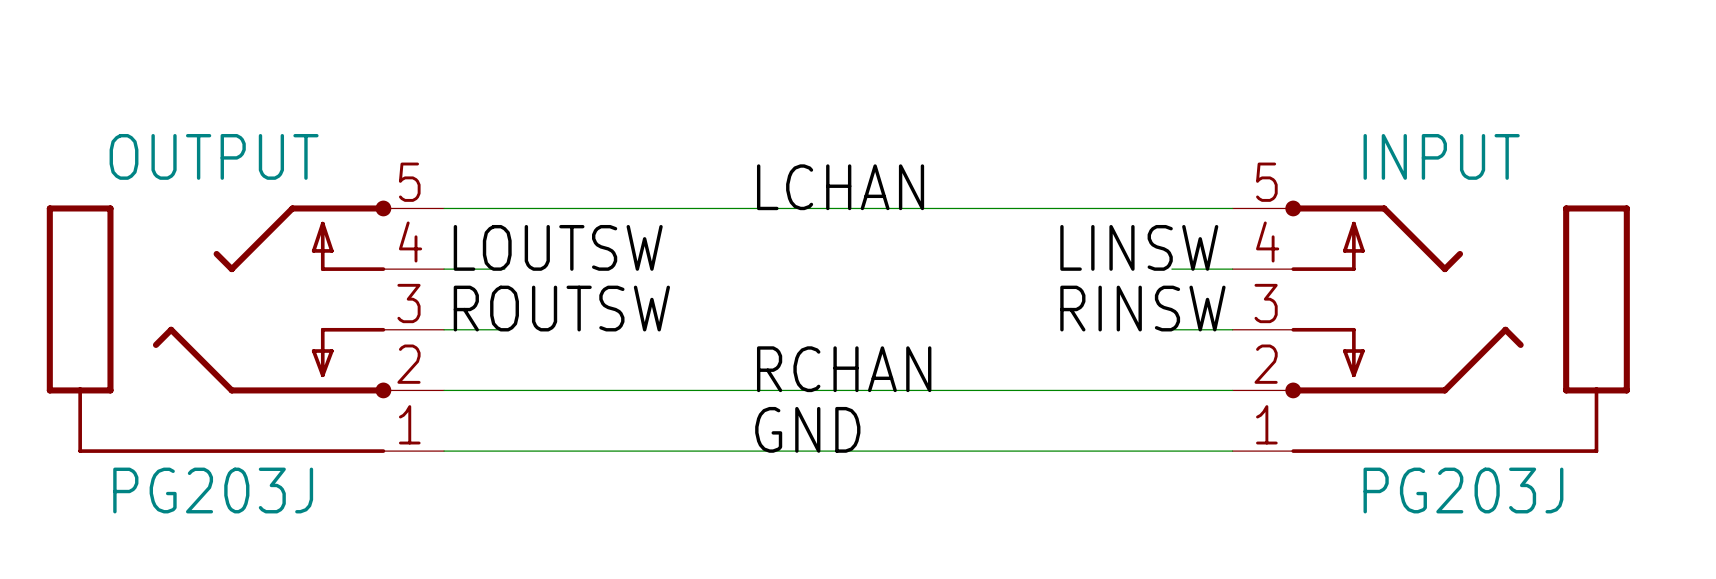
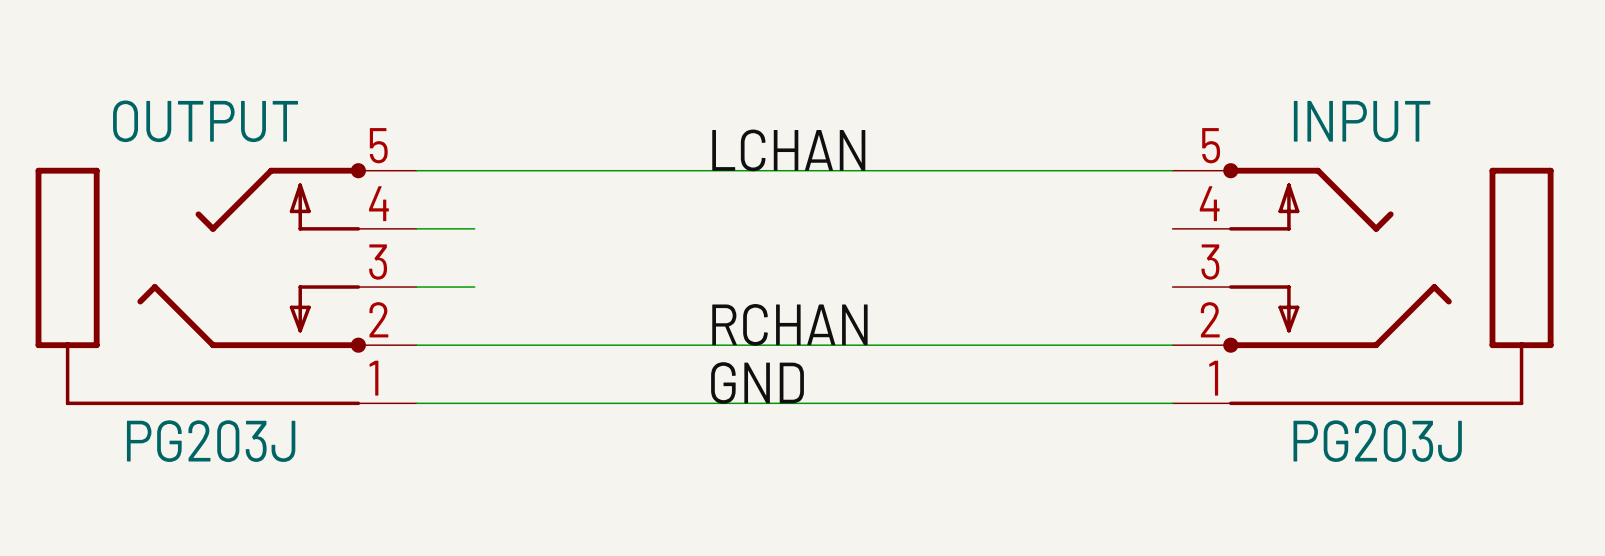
label: LOUTSW (558, 247) -> none
label: LINSW (1139, 247) -> none
wire: (1171, 269) (1232, 269) -> none
label: ROUTSW (561, 308) -> none
label: RINSW (1142, 308) -> none
wire: (1171, 329) (1232, 329) -> none

